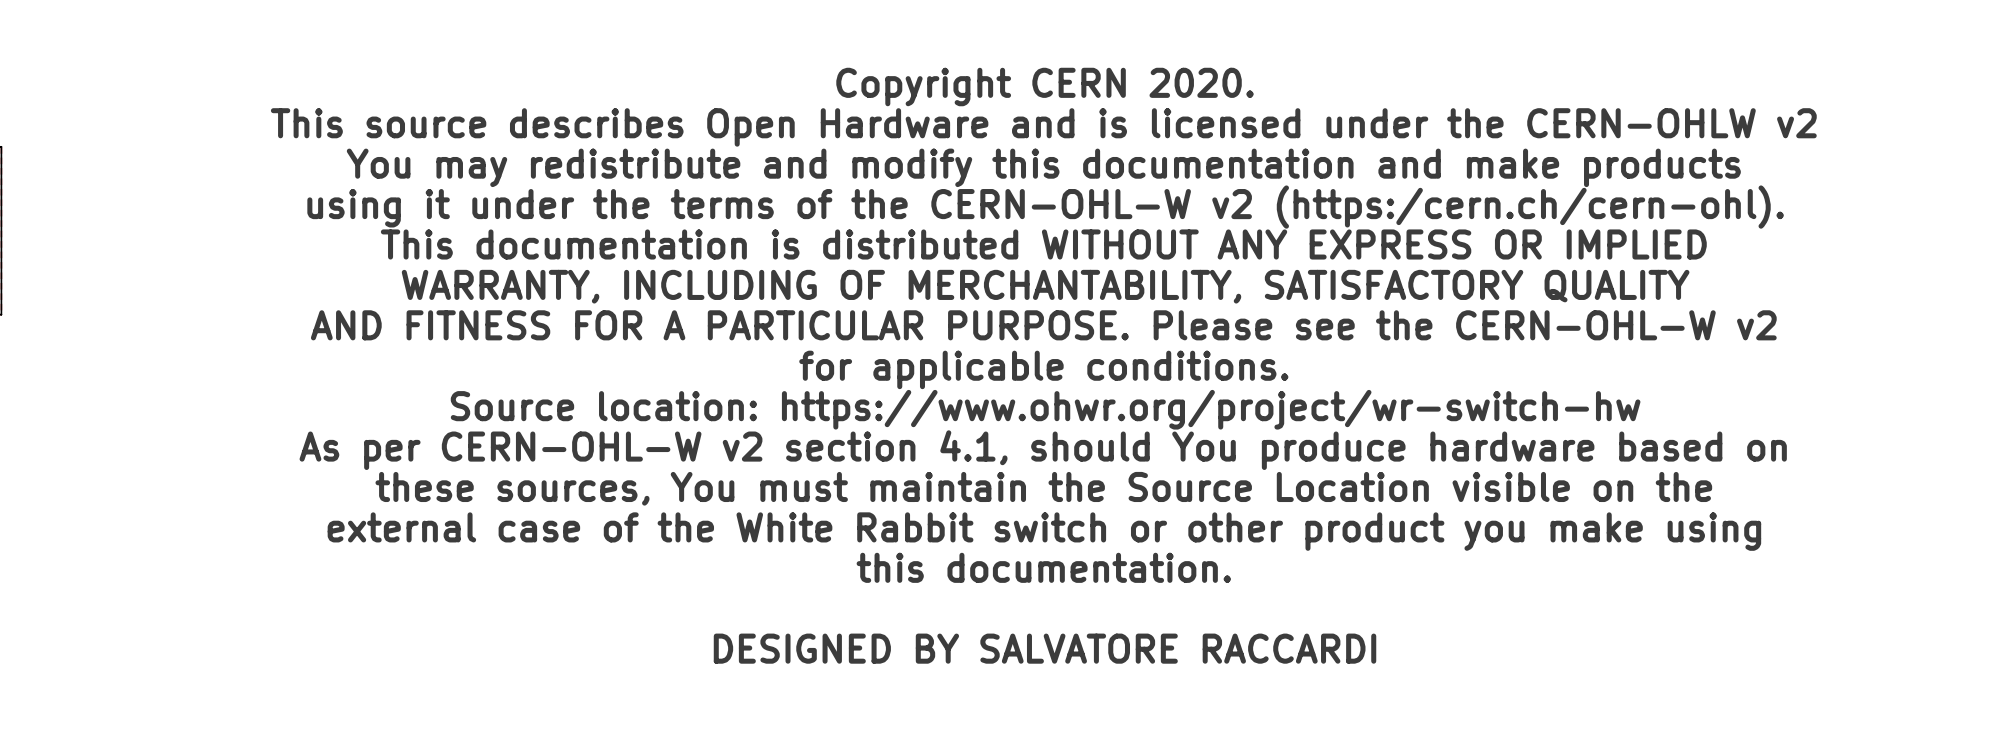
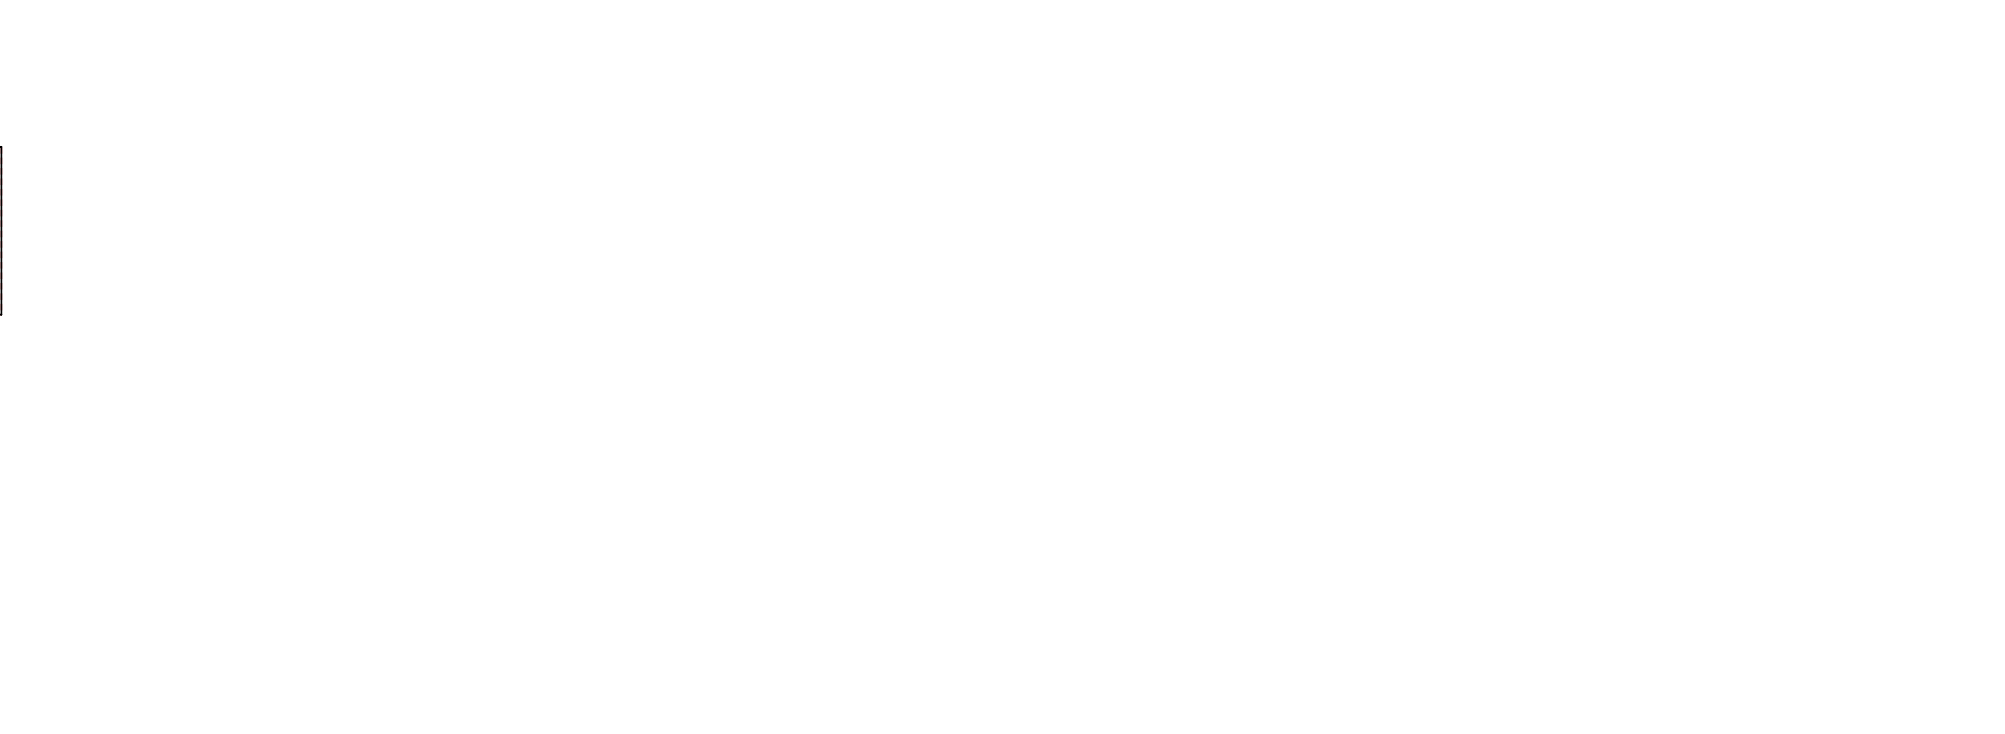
text: Copyright CERN 2020. (1045, 87) -> none
text: This source describes Open Hardware and is licensed under the CERN-OHLW v2 (1043, 127) -> none
text: You may redistribute and modify this documentation and make products (1043, 167) -> none
text: using it under the terms of the CERN-OHL-W v2 (https:/cern.ch/cern-ohl). (1045, 207) -> none
text: This documentation is distributed WITHOUT ANY EXPRESS OR IMPLIED (1043, 244) -> none
text: WARRANTY, INCLUDING OF MERCHANTABILITY, SATISFACTORY QUALITY (1045, 286) -> none
text: AND FITNESS FOR A PARTICULAR PURPOSE. Please see the CERN-OHL-W v2 (1043, 325) -> none
text: for applicable conditions. (1043, 369) -> none
text: Source location: https://www.ohwr.org/project/wr-switch-hw (1045, 409) -> none
text: As per CERN-OHL-W v2 section 4.1, should You produce hardware based on (1043, 450) -> none
text: these sources, You must maintain the Source Location visible on the (1043, 488) -> none
text: external case of the White Rabbit switch or other product you make using (1044, 531) -> none
text: this documentation. (1043, 567) -> none
text: DESIGNED BY SALVATORE RACCARDI (1045, 648) -> none

